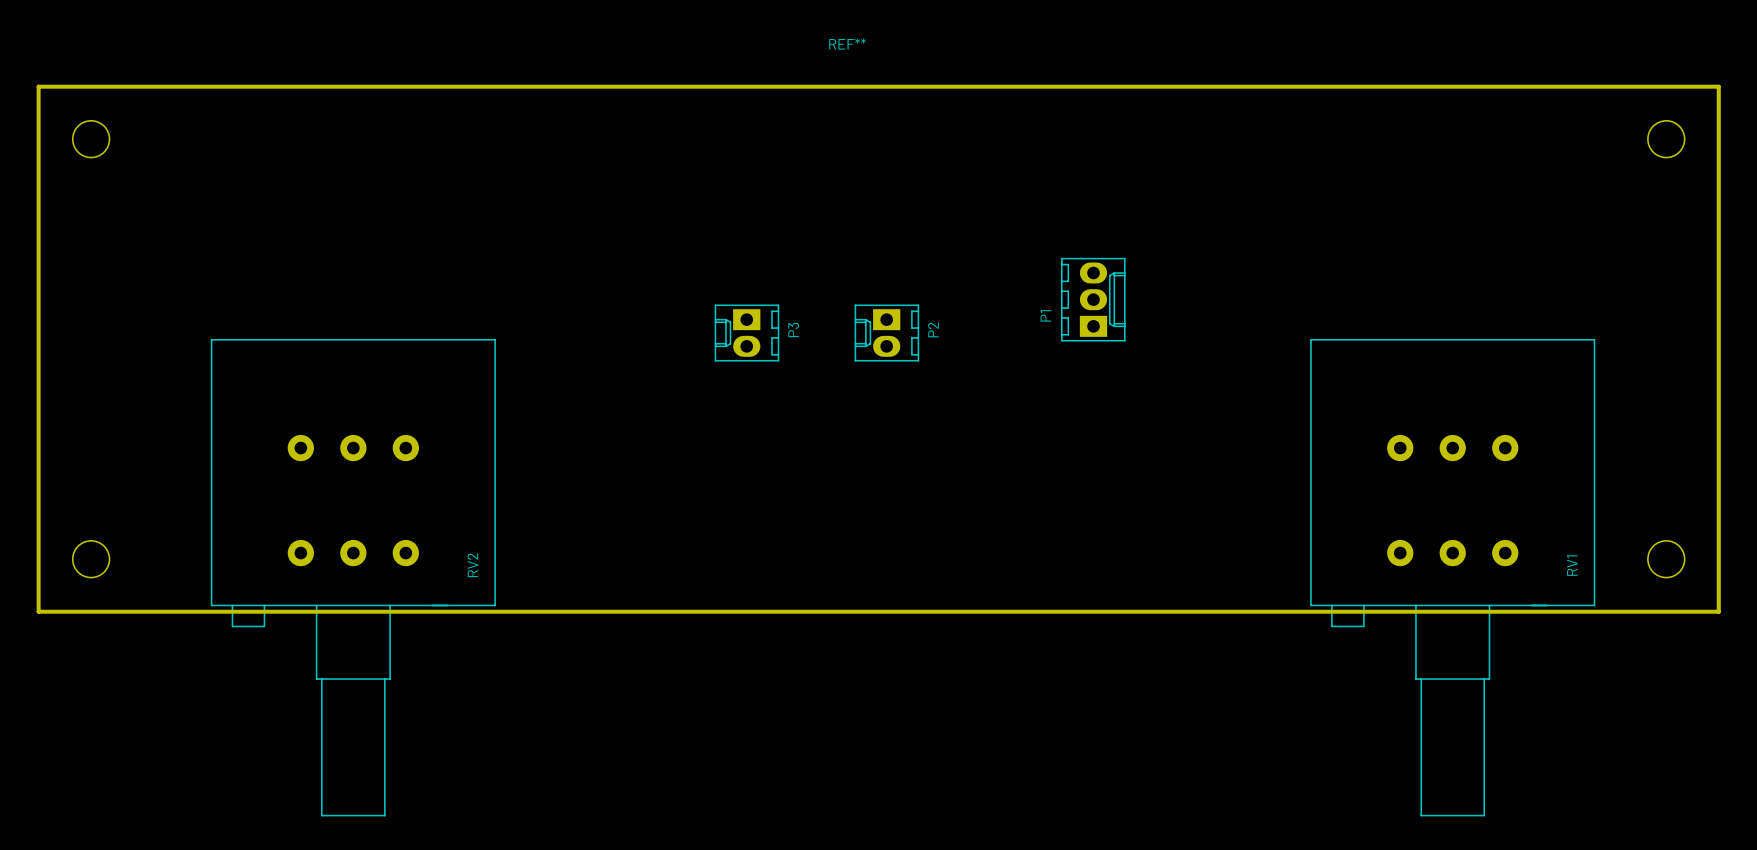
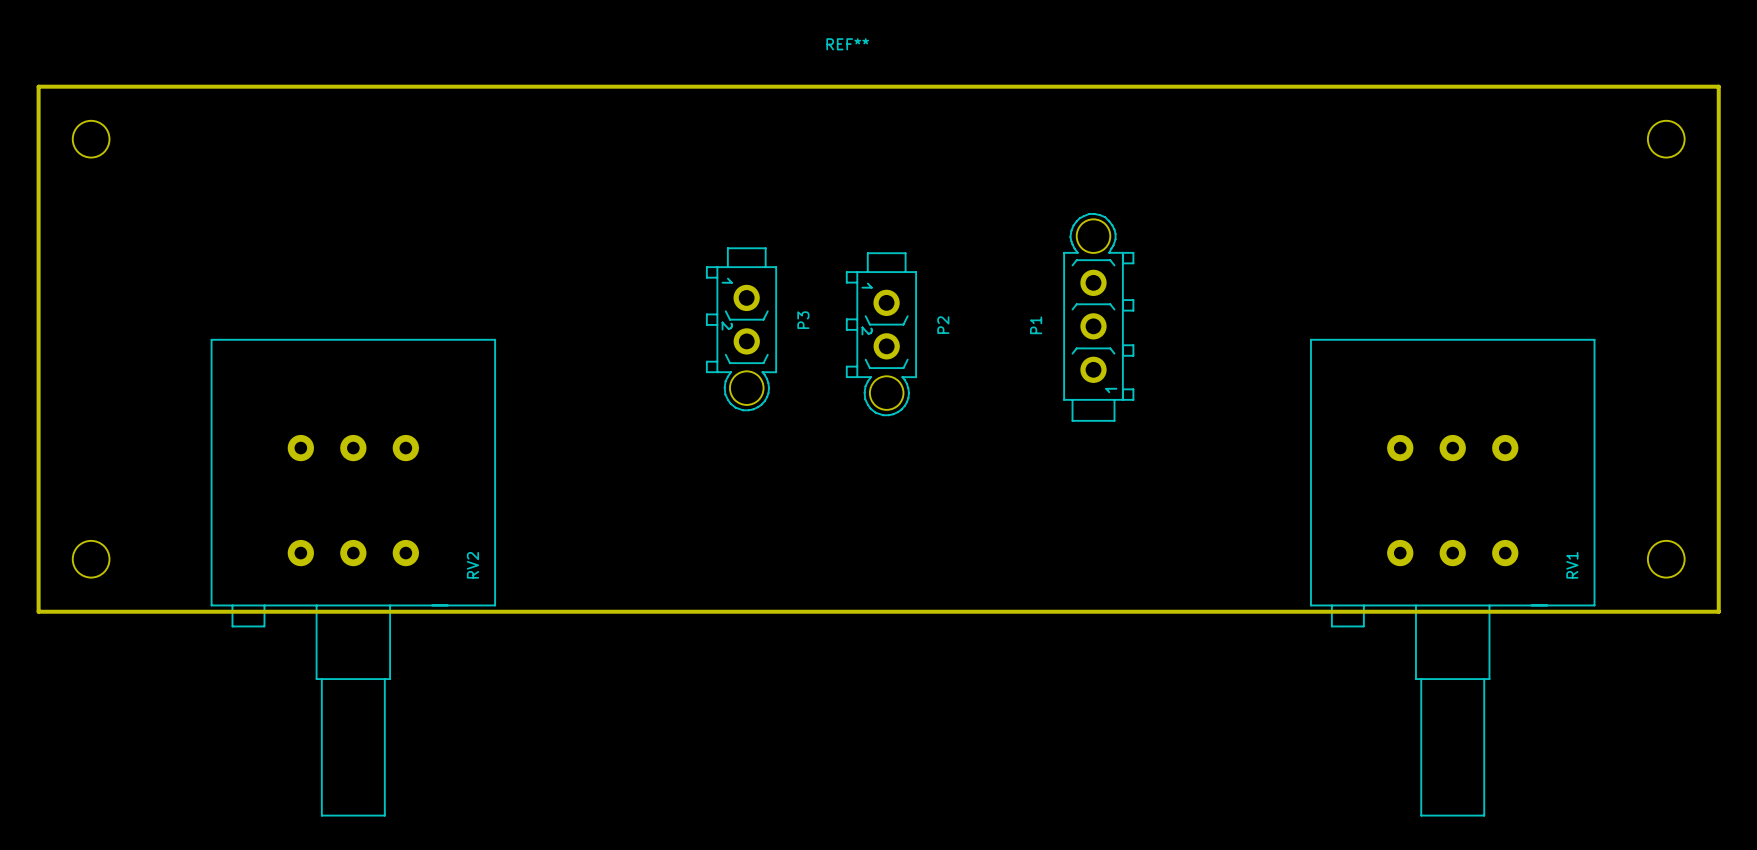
P1 footprint: [1061, 257, 1126, 342] -> [1063, 213, 1135, 422]
P3 footprint: [714, 304, 780, 362] -> [706, 247, 777, 412]
P2 footprint: [854, 304, 920, 362] -> [846, 252, 917, 417]

